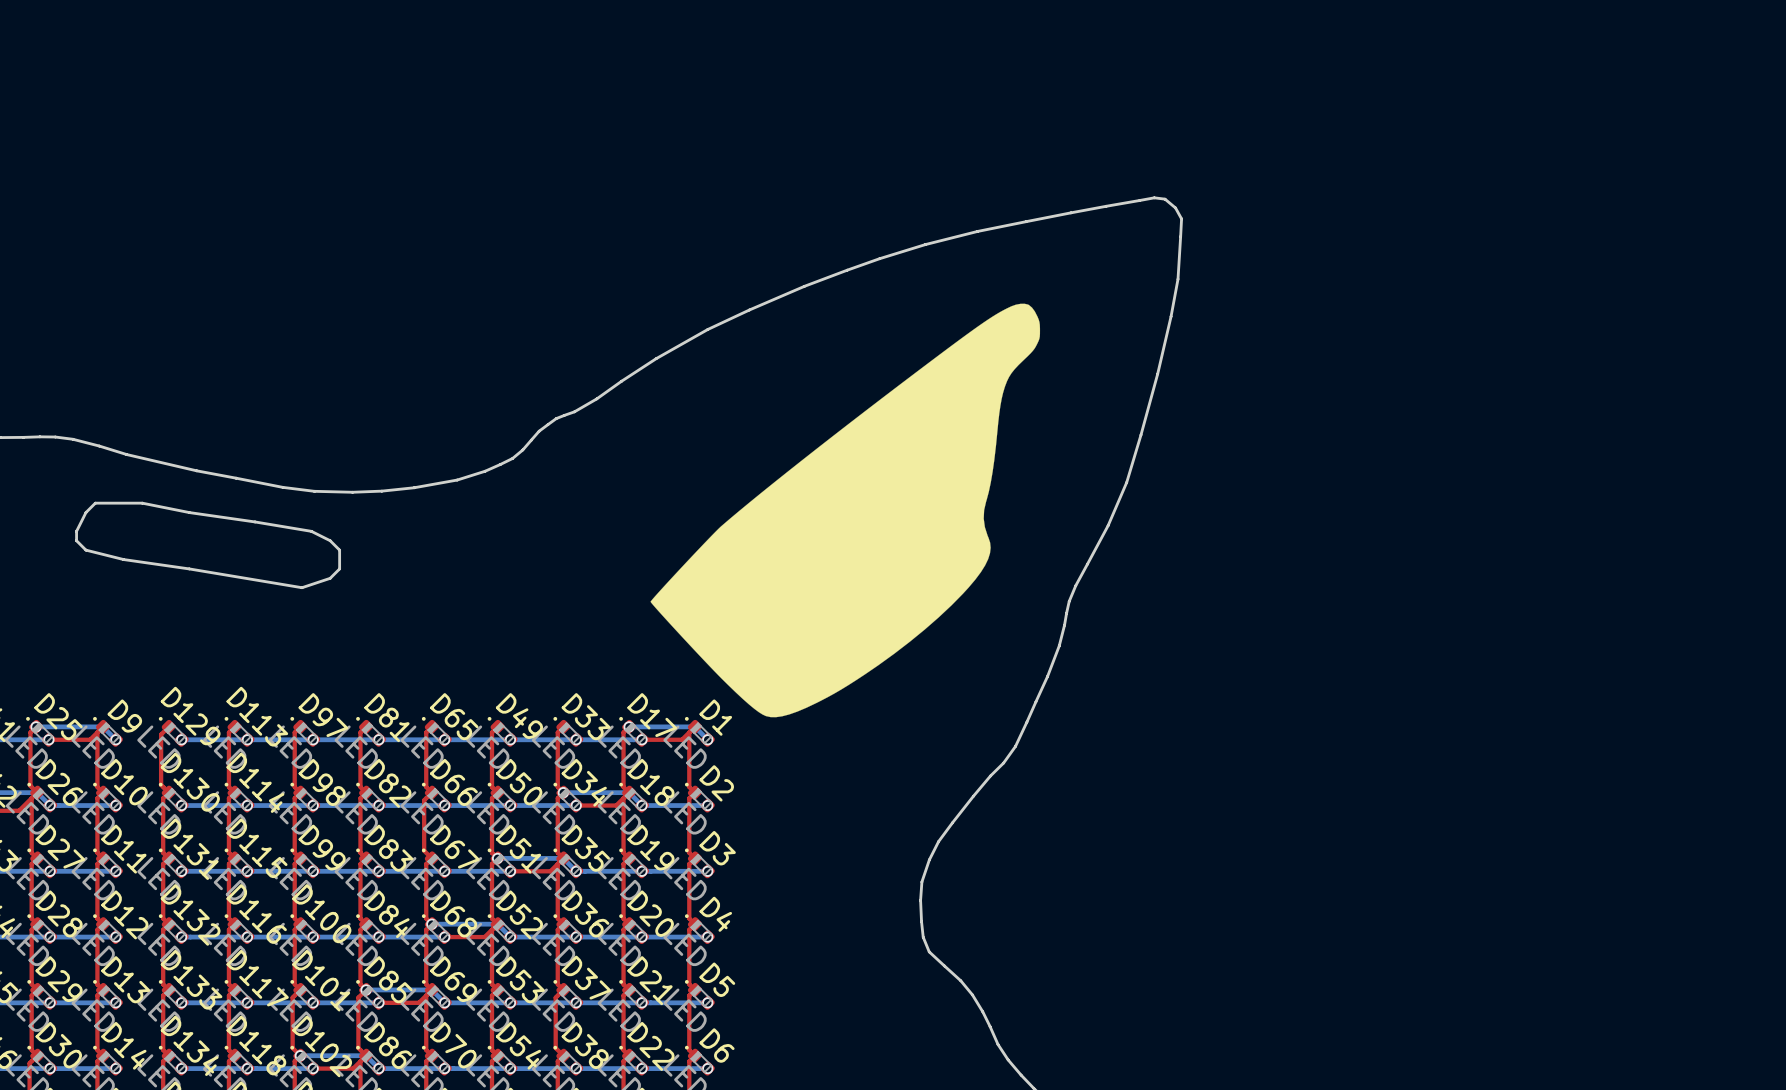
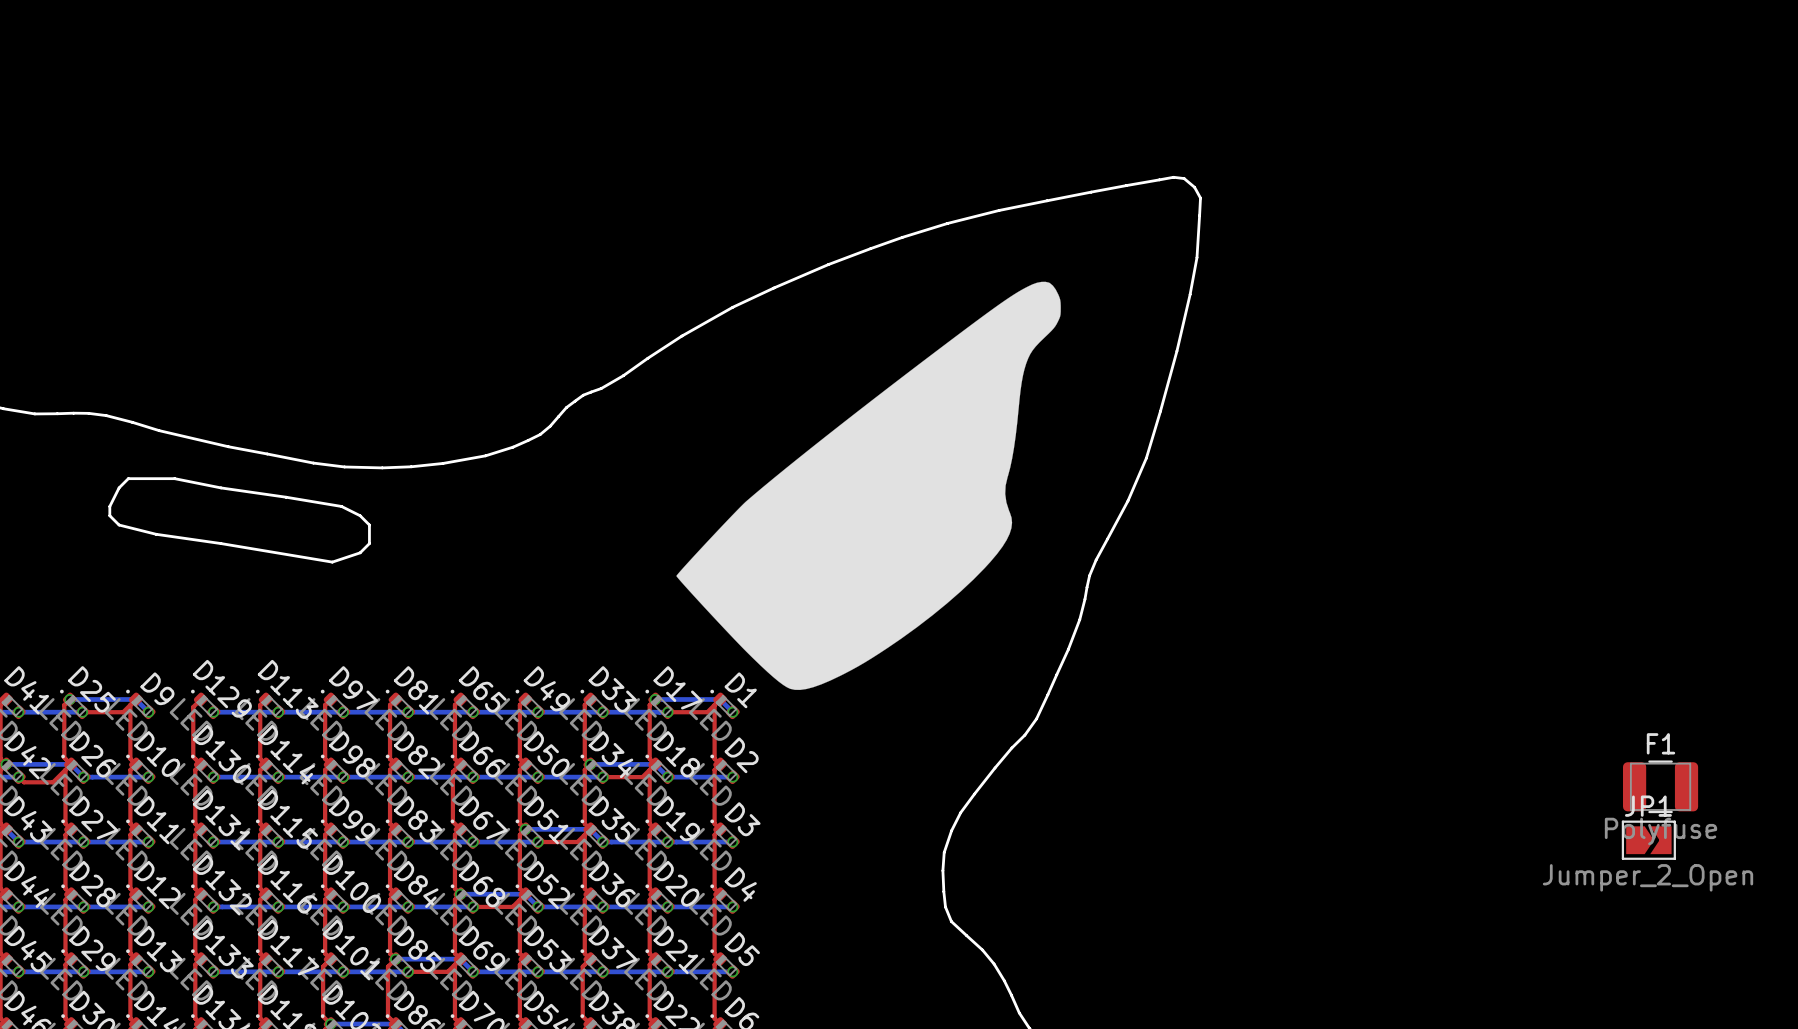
F1: none -> Polyfuse (1660, 786)
JP1: none -> Jumper_2_Open (1648, 840)

